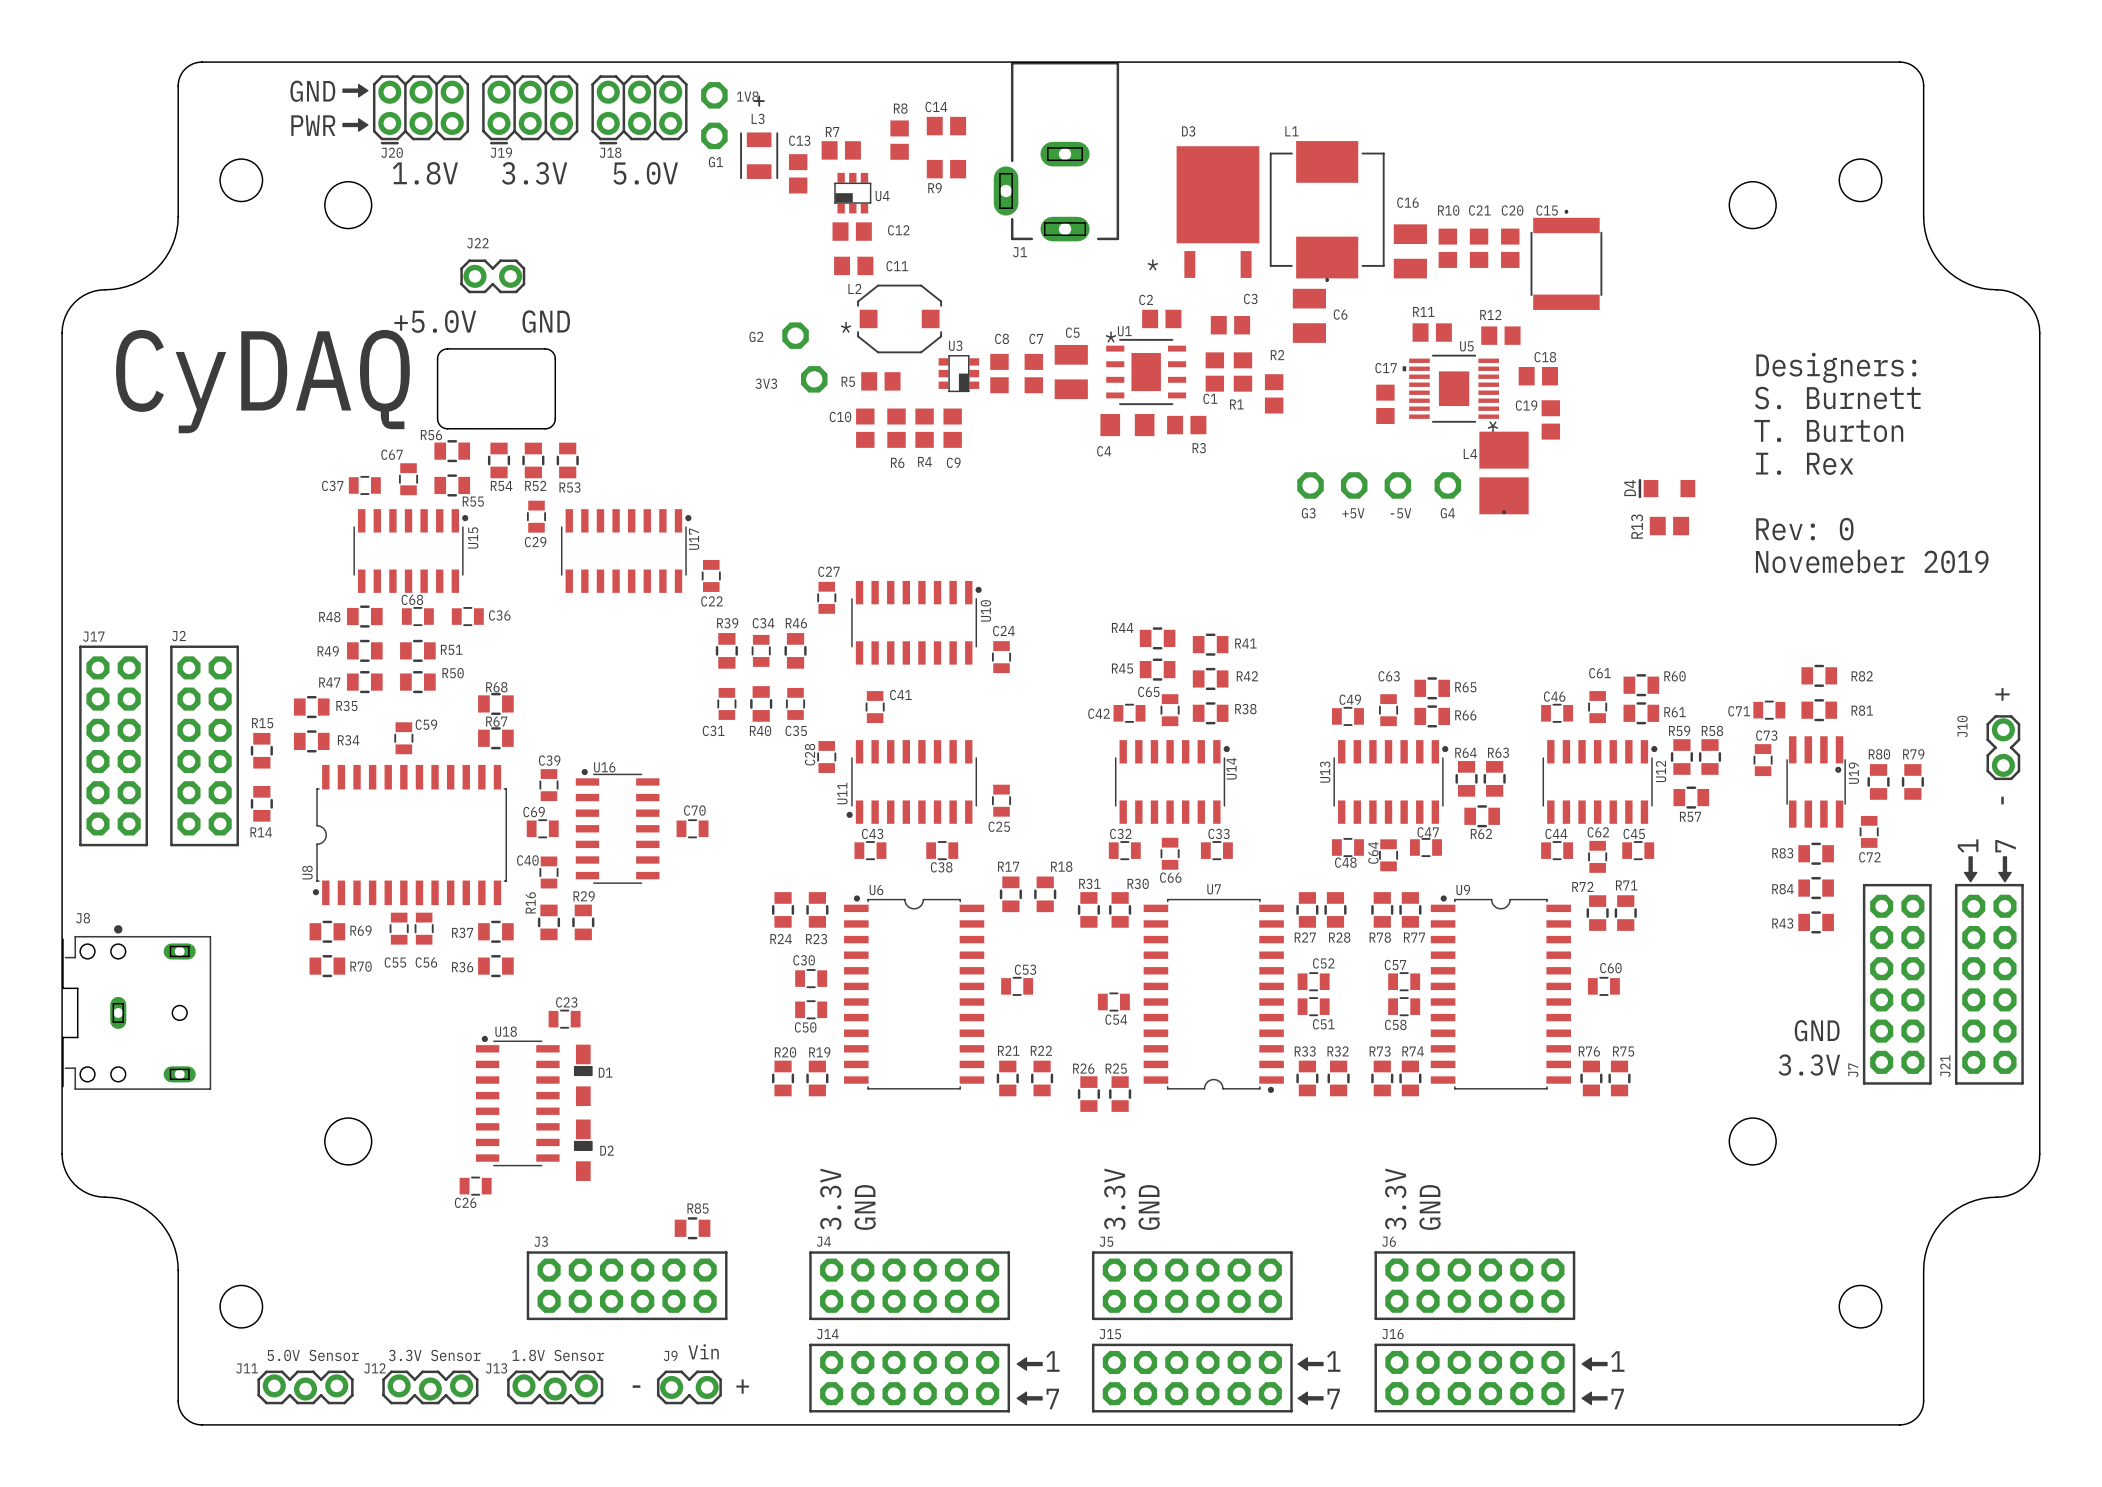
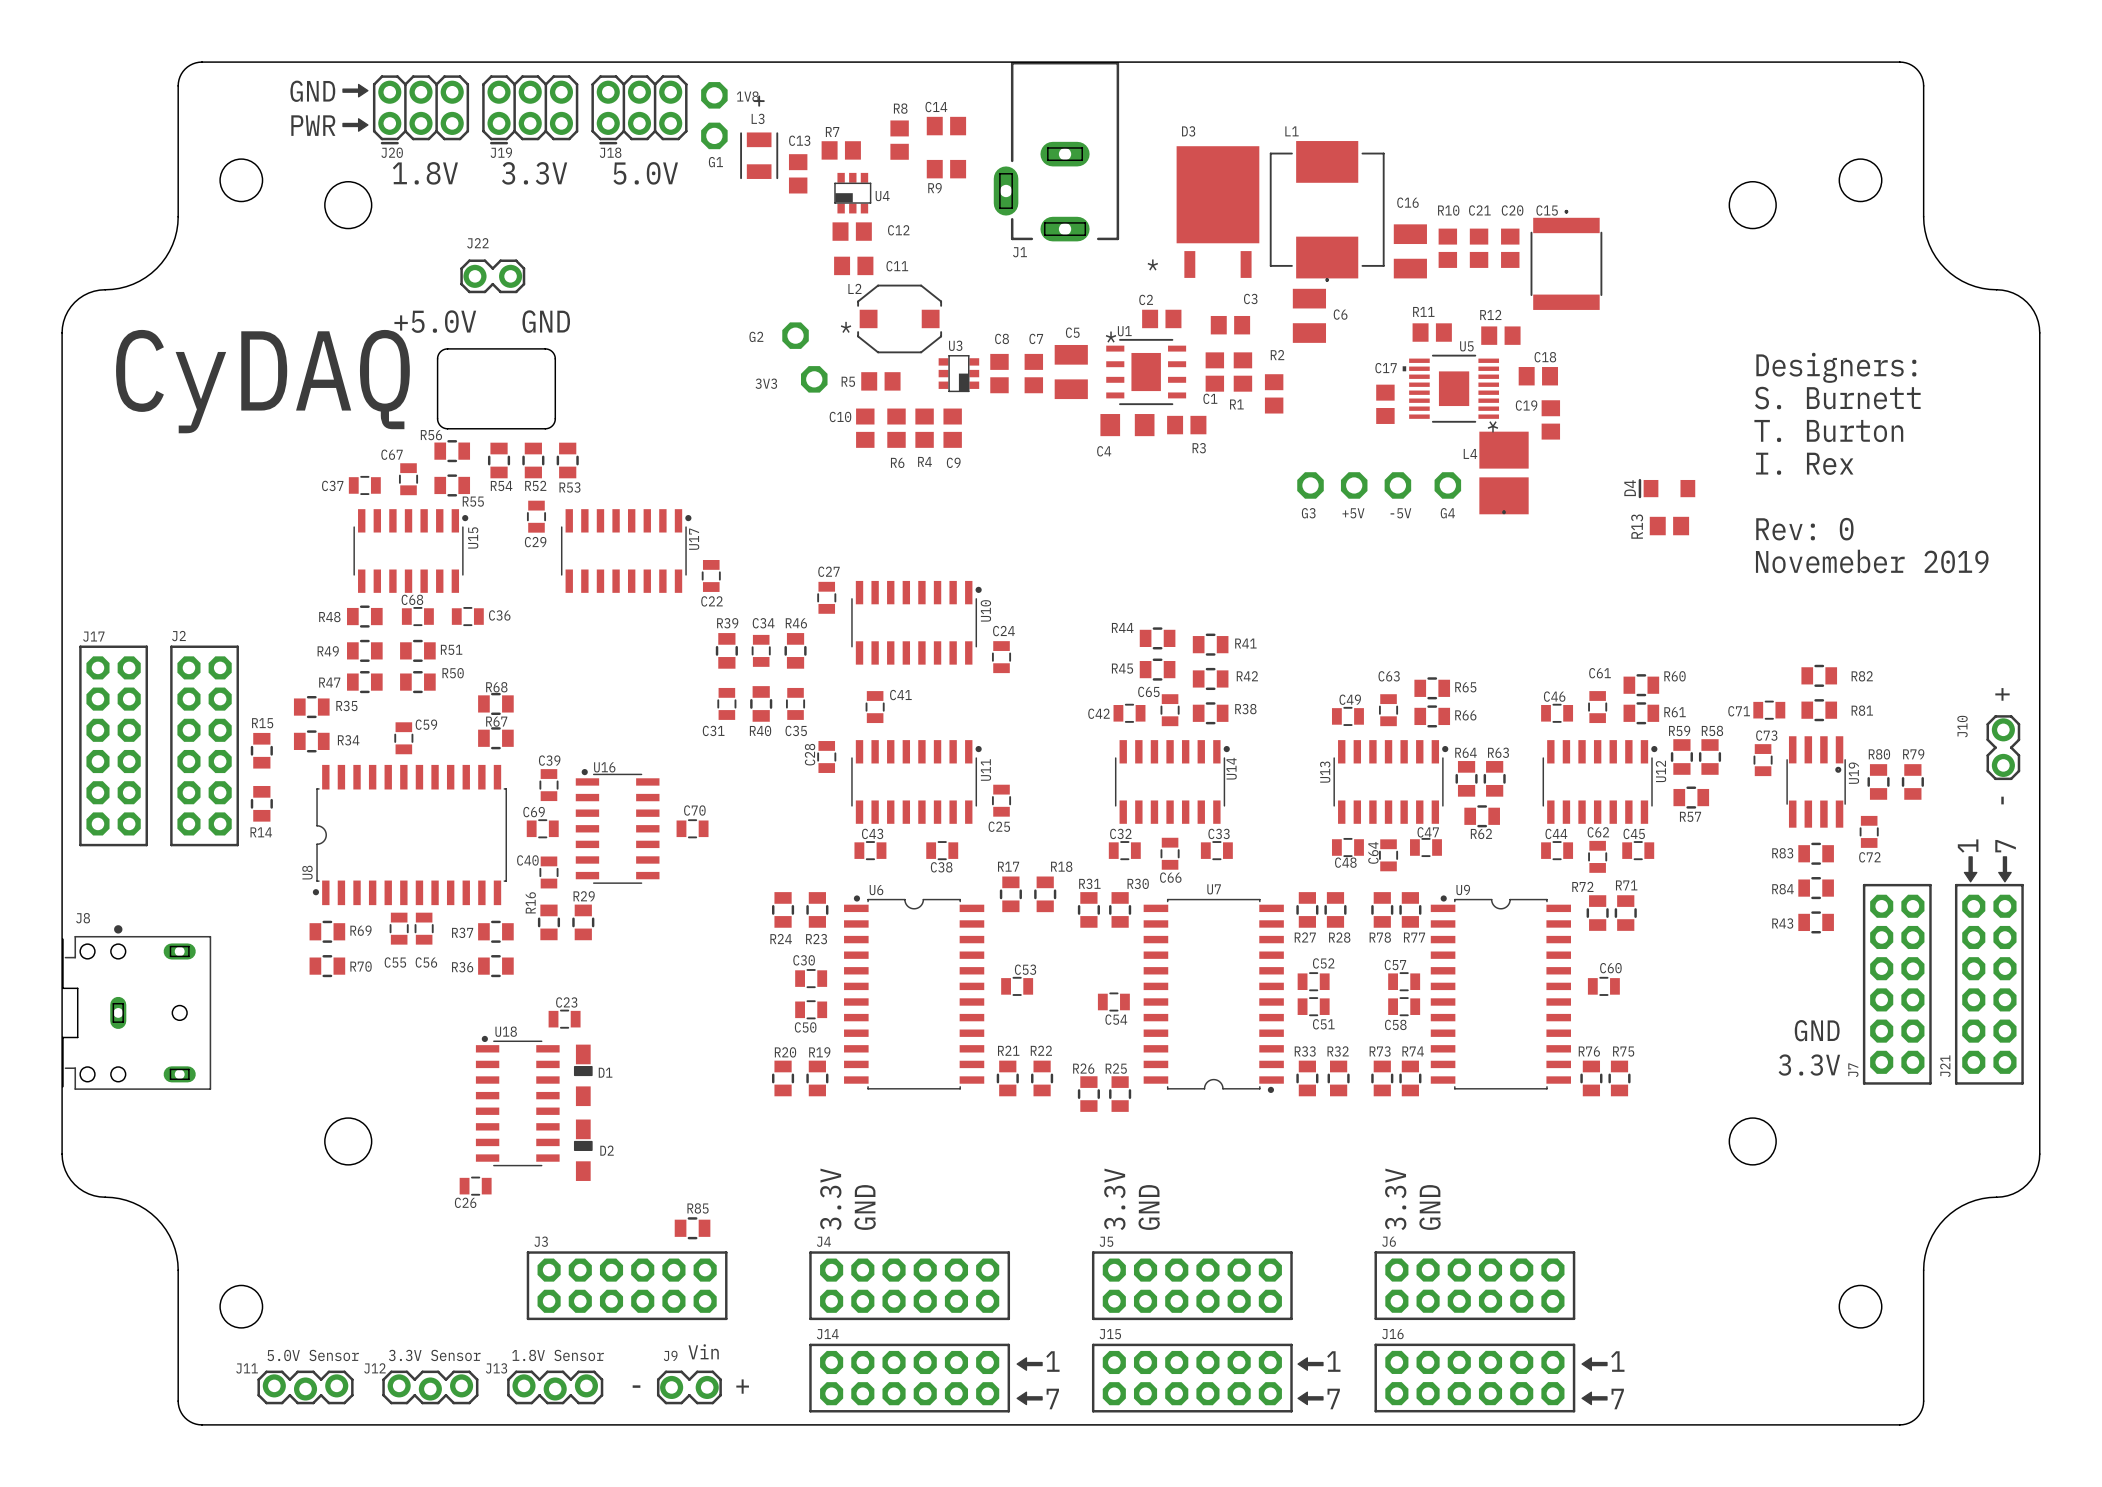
U11 rotation: 0° (911, 781) -> 180° (916, 781)

